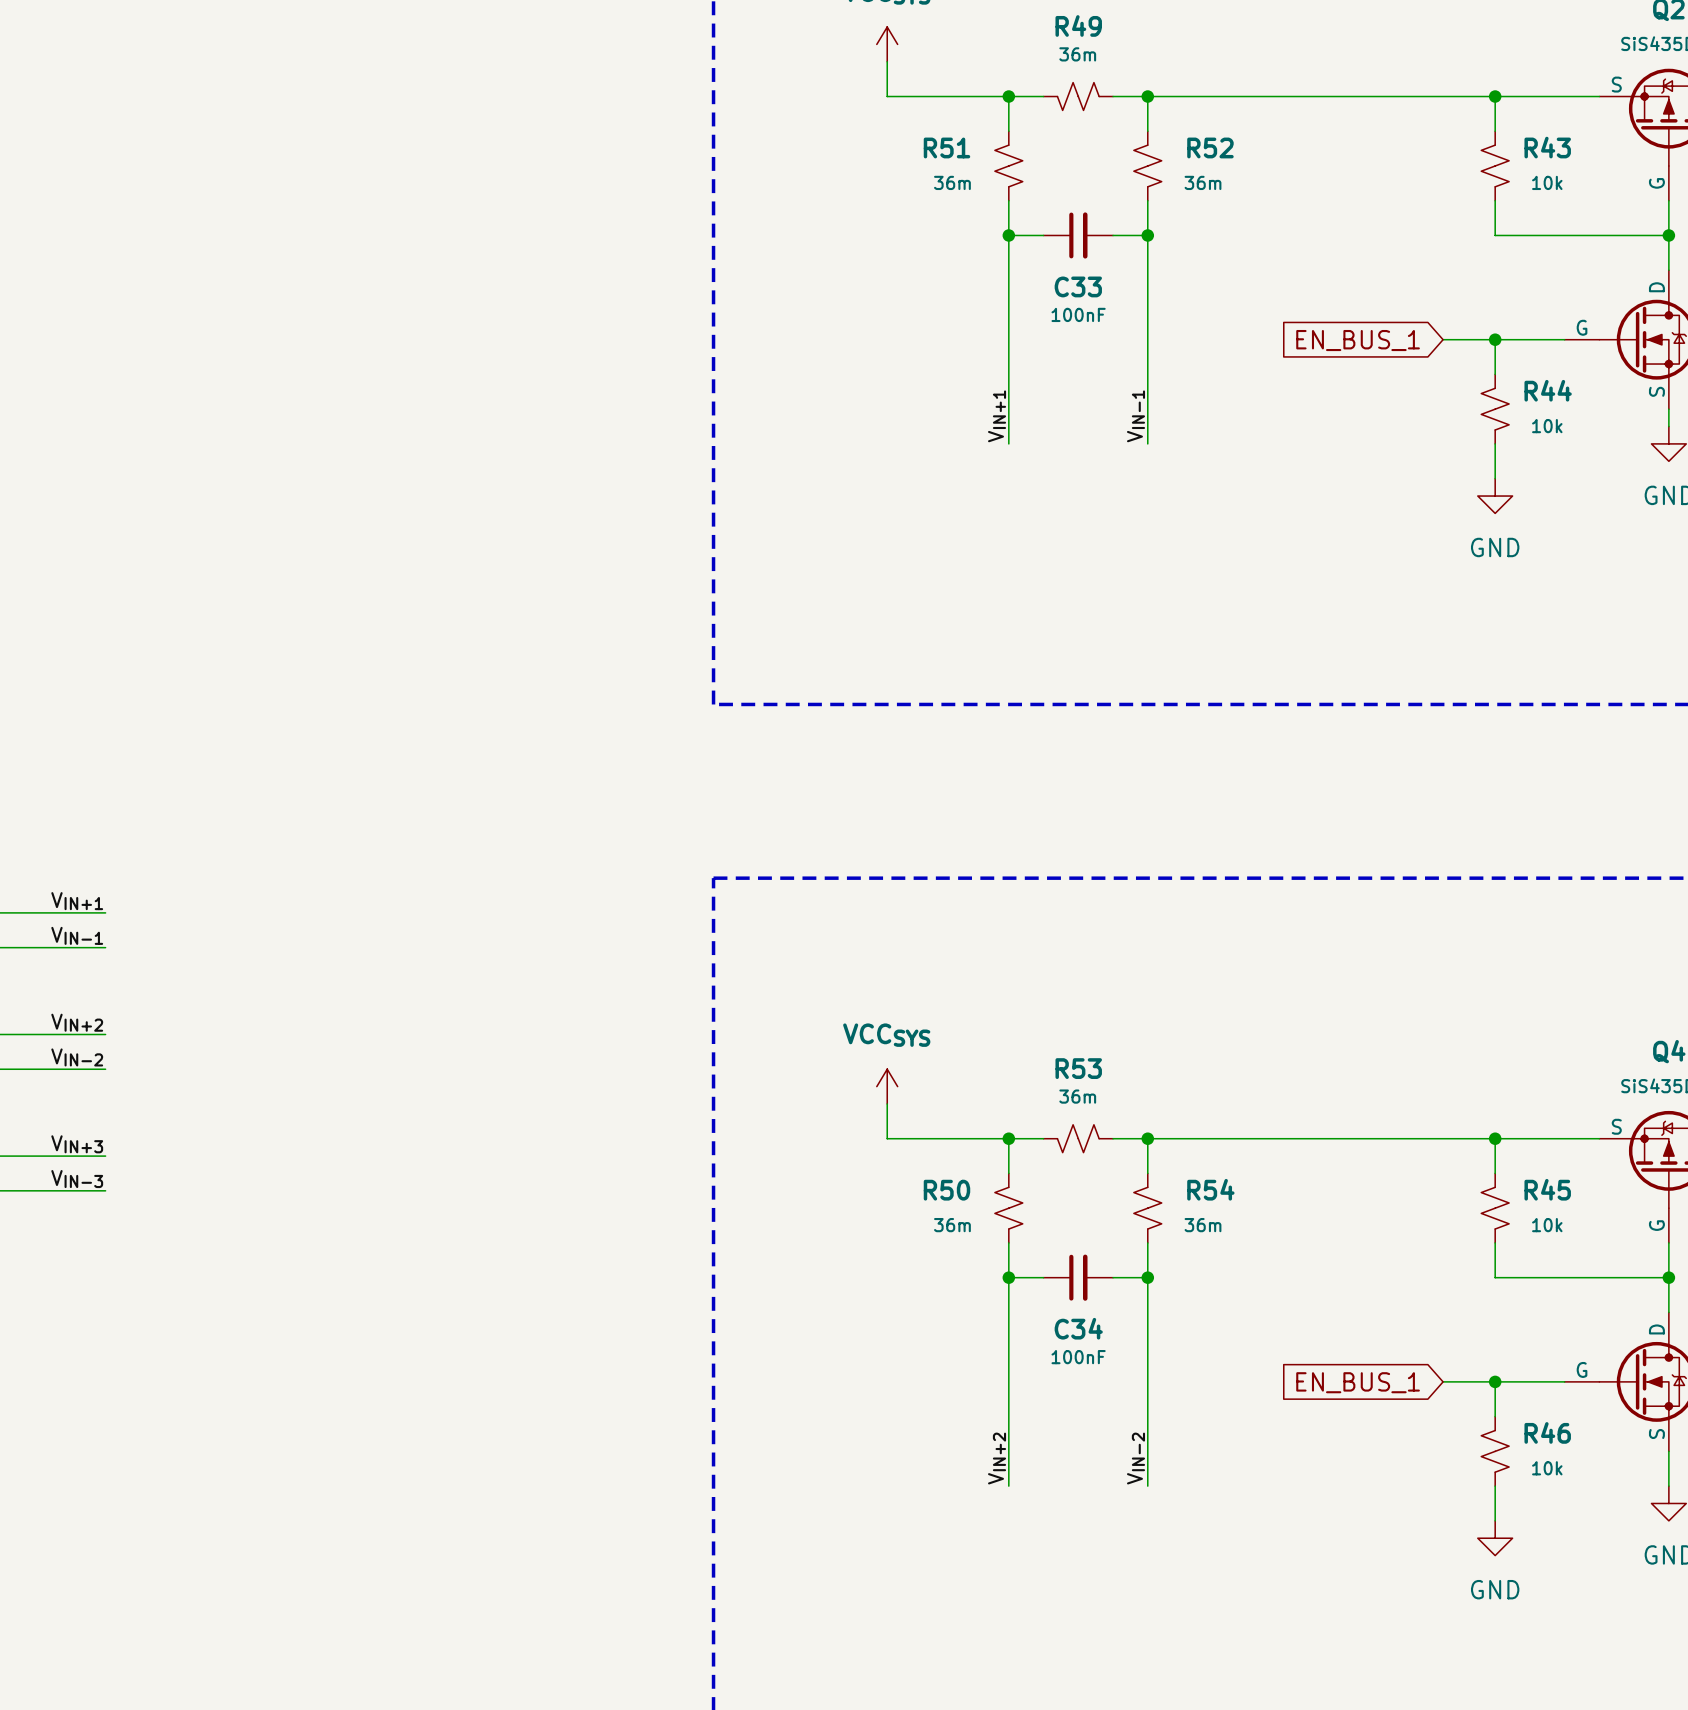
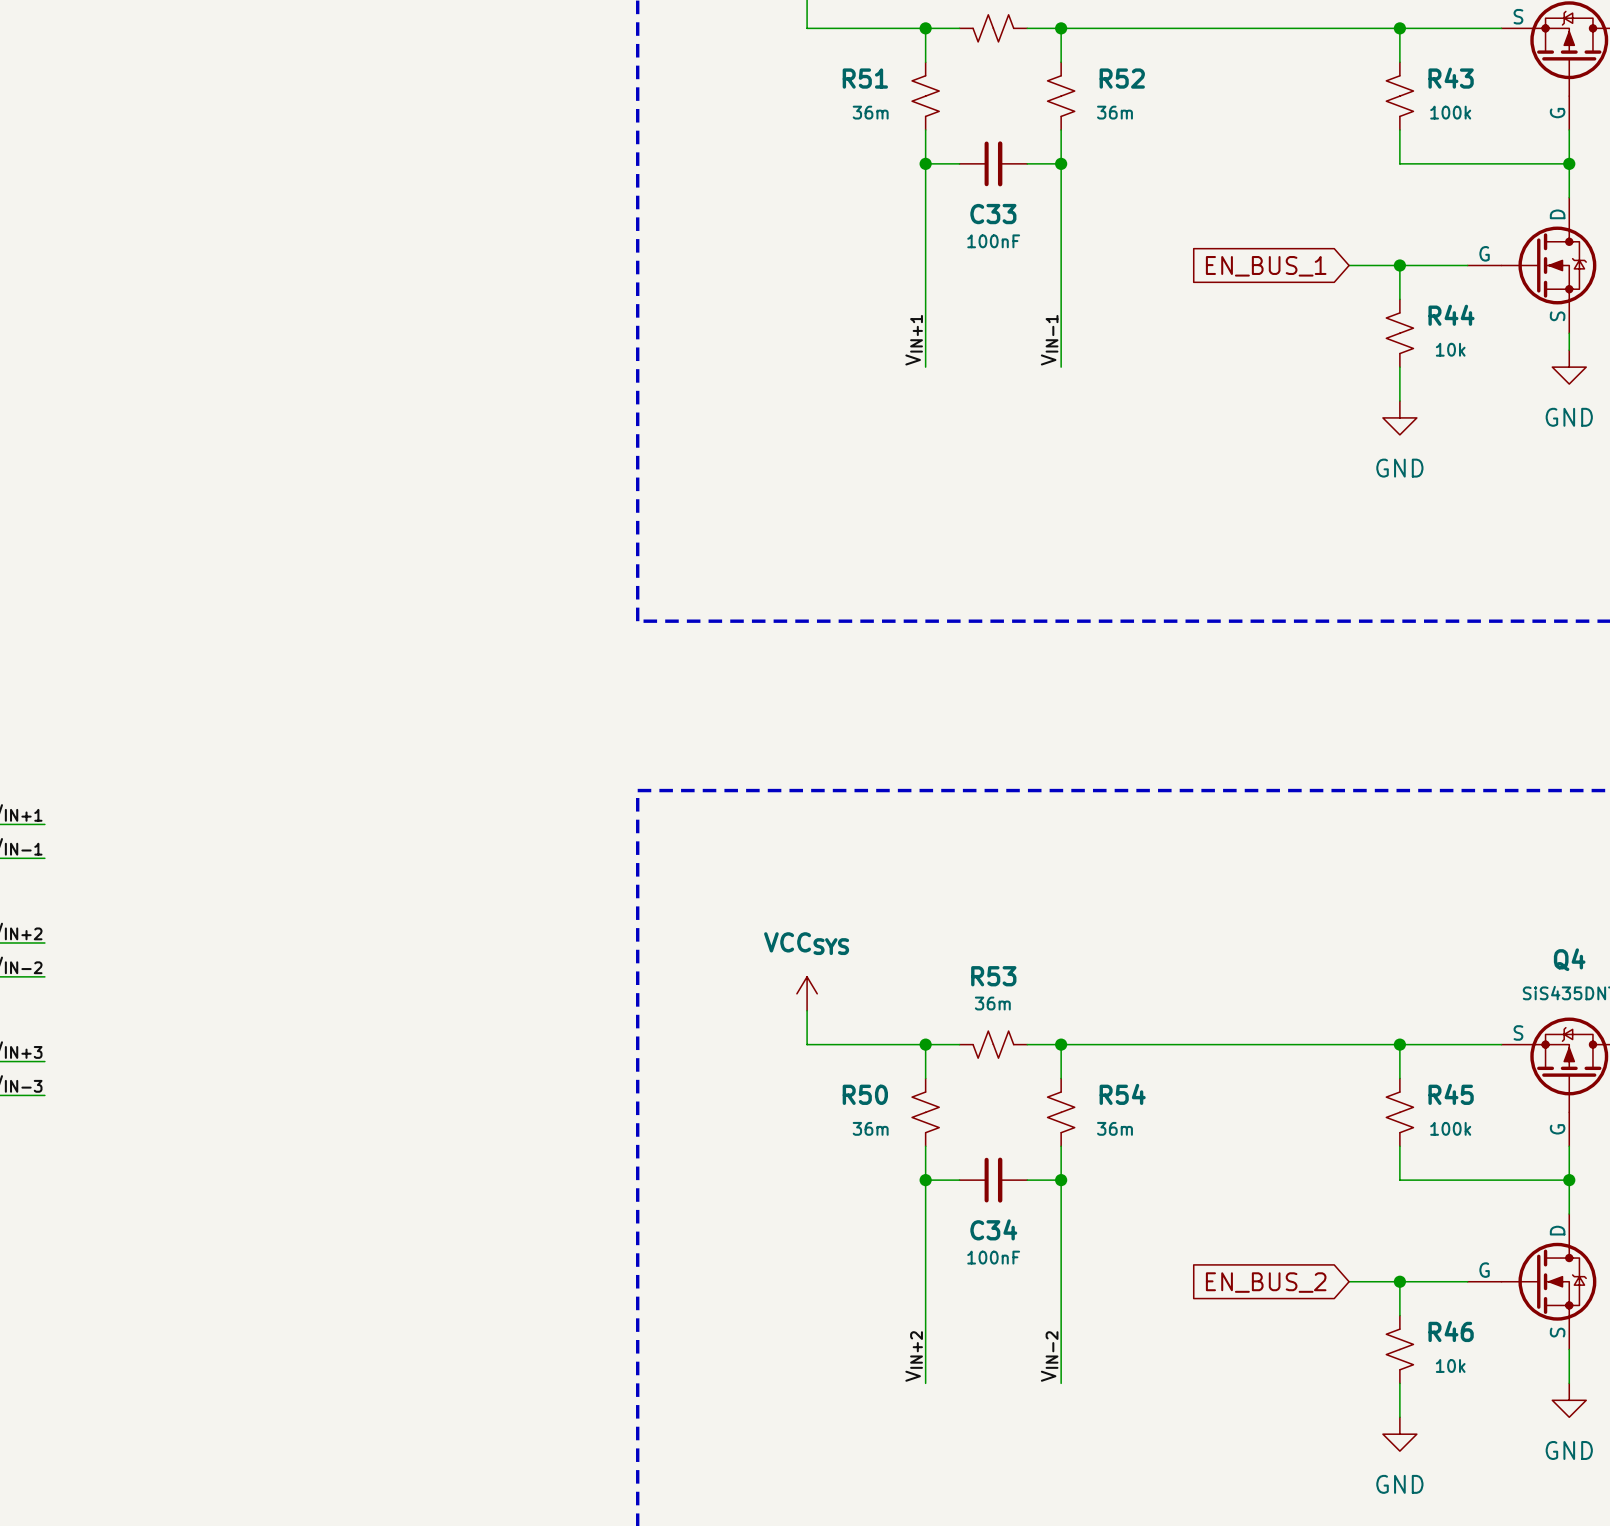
R43 value: 10k (1547, 182) -> 100k (1450, 112)
R45 value: 10k (1547, 1225) -> 100k (1450, 1128)
global label: EN_BUS_1 (1358, 1382) -> EN_BUS_2 (1266, 1282)

